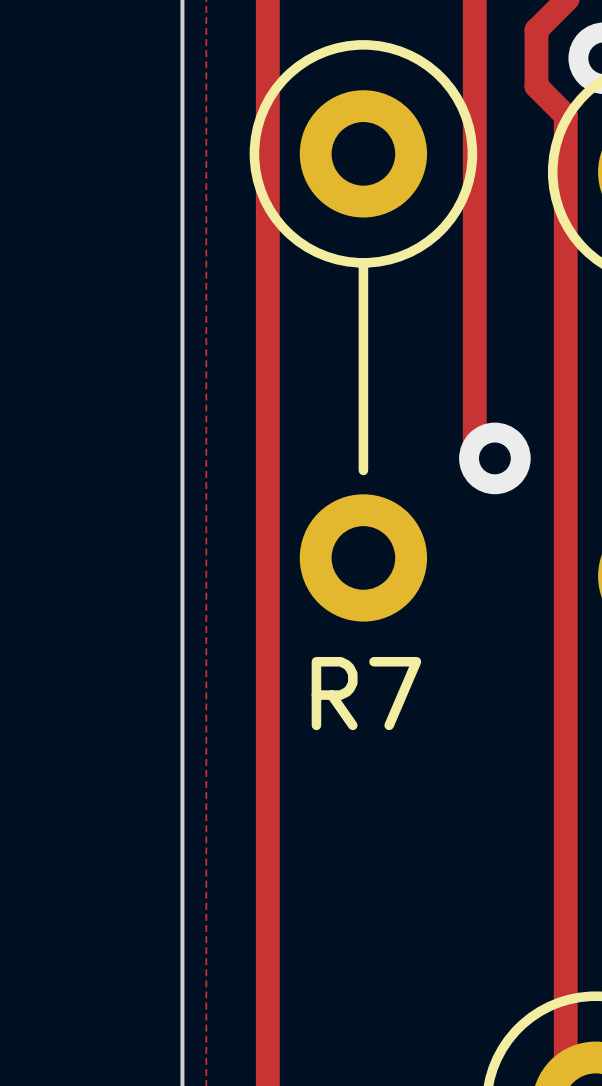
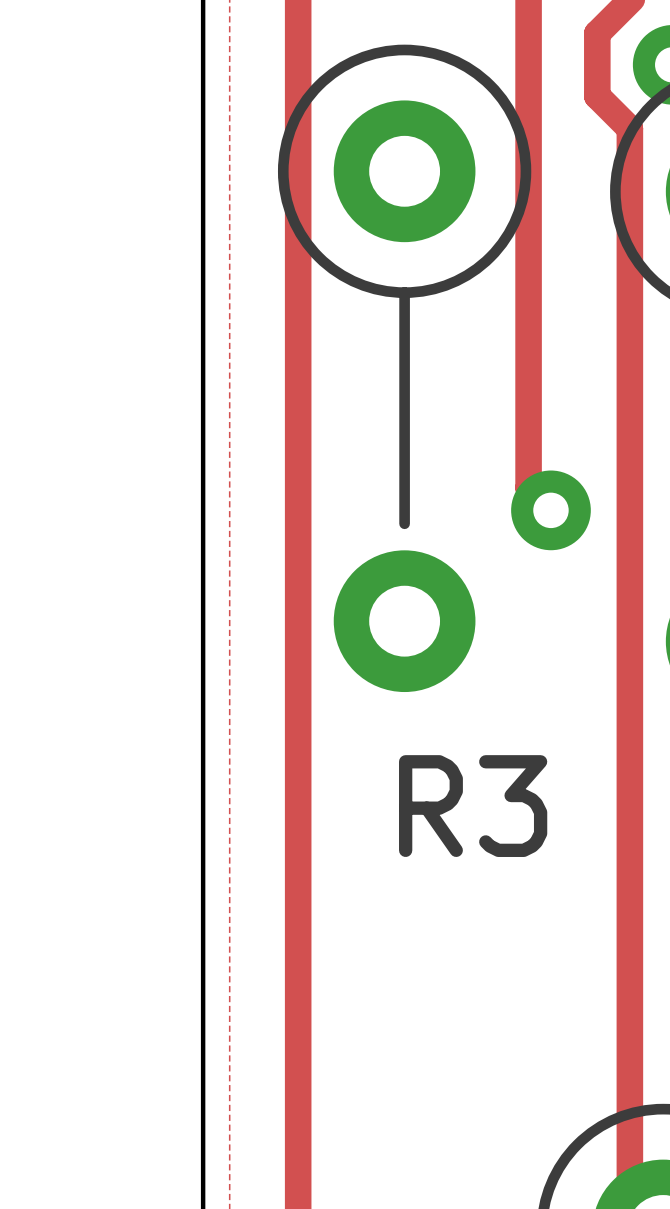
R7 name: R7 (366, 693) -> none
R3 name: none -> R3 (473, 806)

